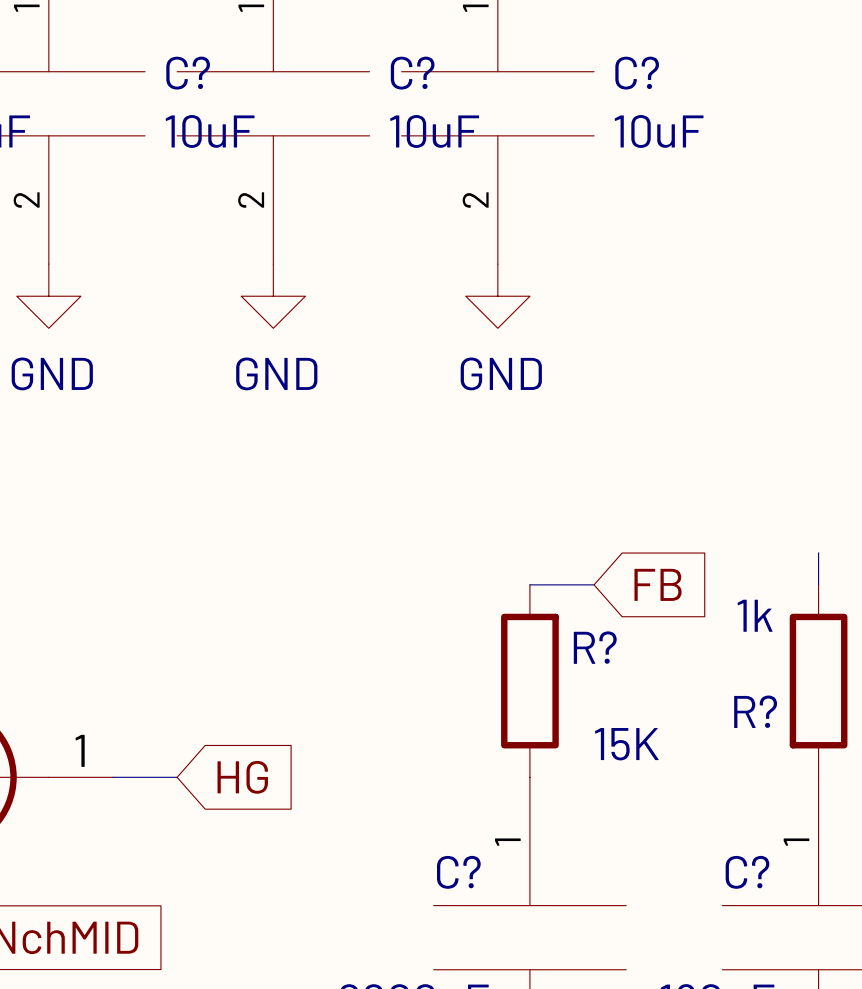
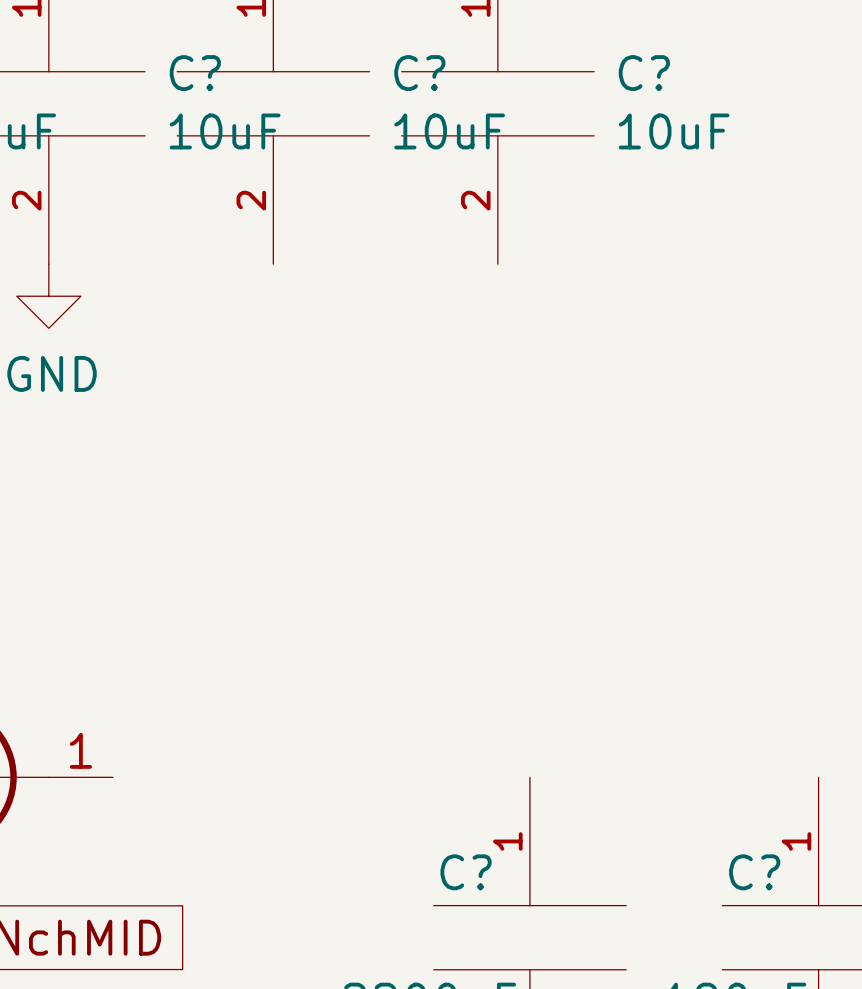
power symbol: GND (273, 296) -> none
power symbol: GND (497, 296) -> none
wire: (818, 552) (818, 584) -> none
wire: (529, 584) (594, 584) -> none
global label: FB (658, 584) -> none
R?: 15K (529, 681) -> none
R?: 1k (818, 681) -> none
wire: (112, 777) (177, 777) -> none
global label: HG (242, 777) -> none

